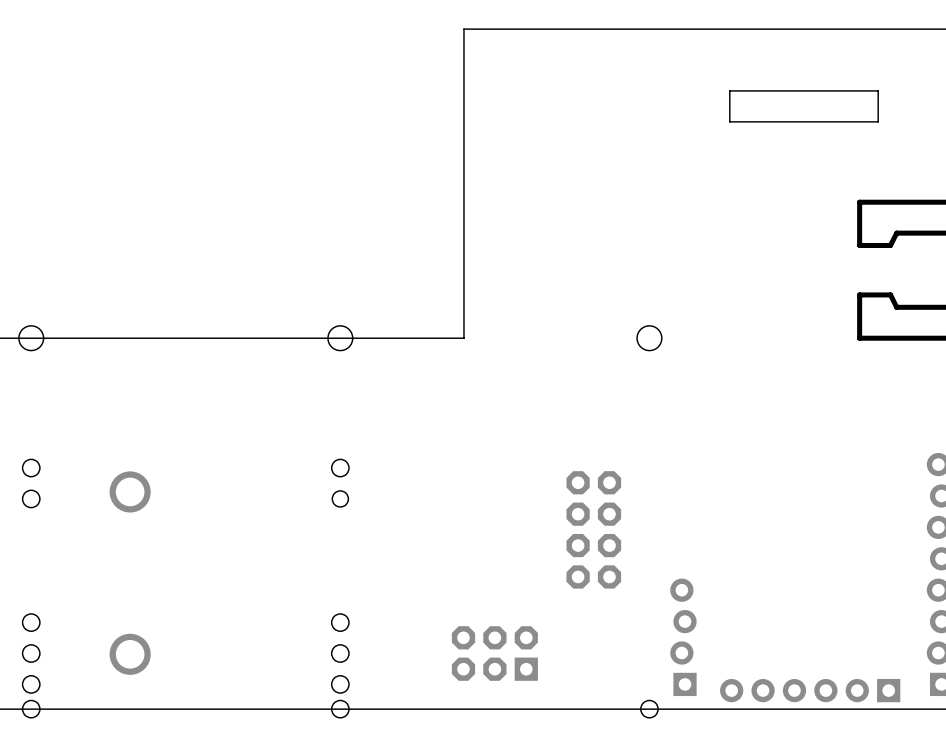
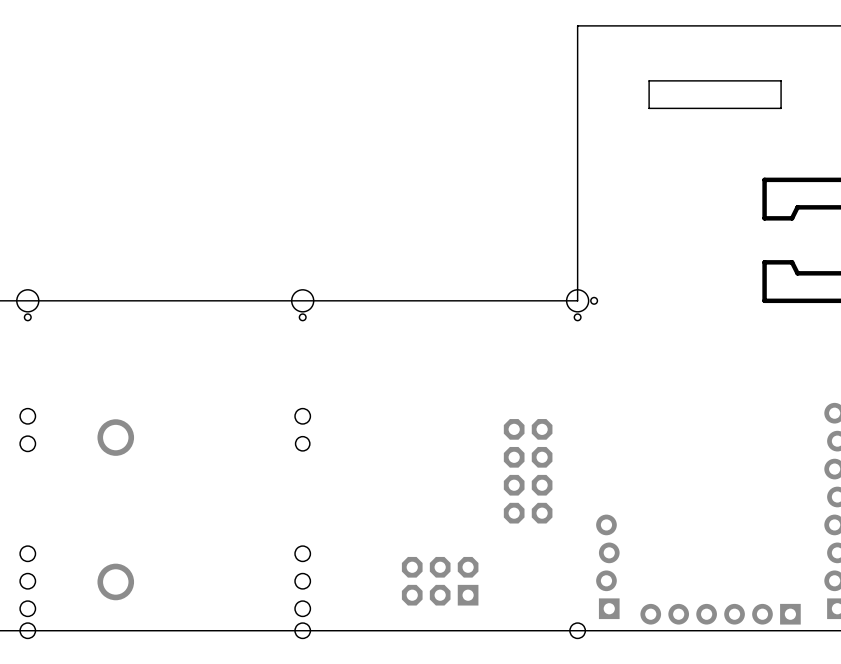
board edge: (649, 29) (463, 29) (463, 338) -> (577, 25) (577, 300) (412, 300)
hole: none -> (594, 300)
hole: none -> (27, 317)
hole: none -> (302, 317)
hole: none -> (577, 317)

